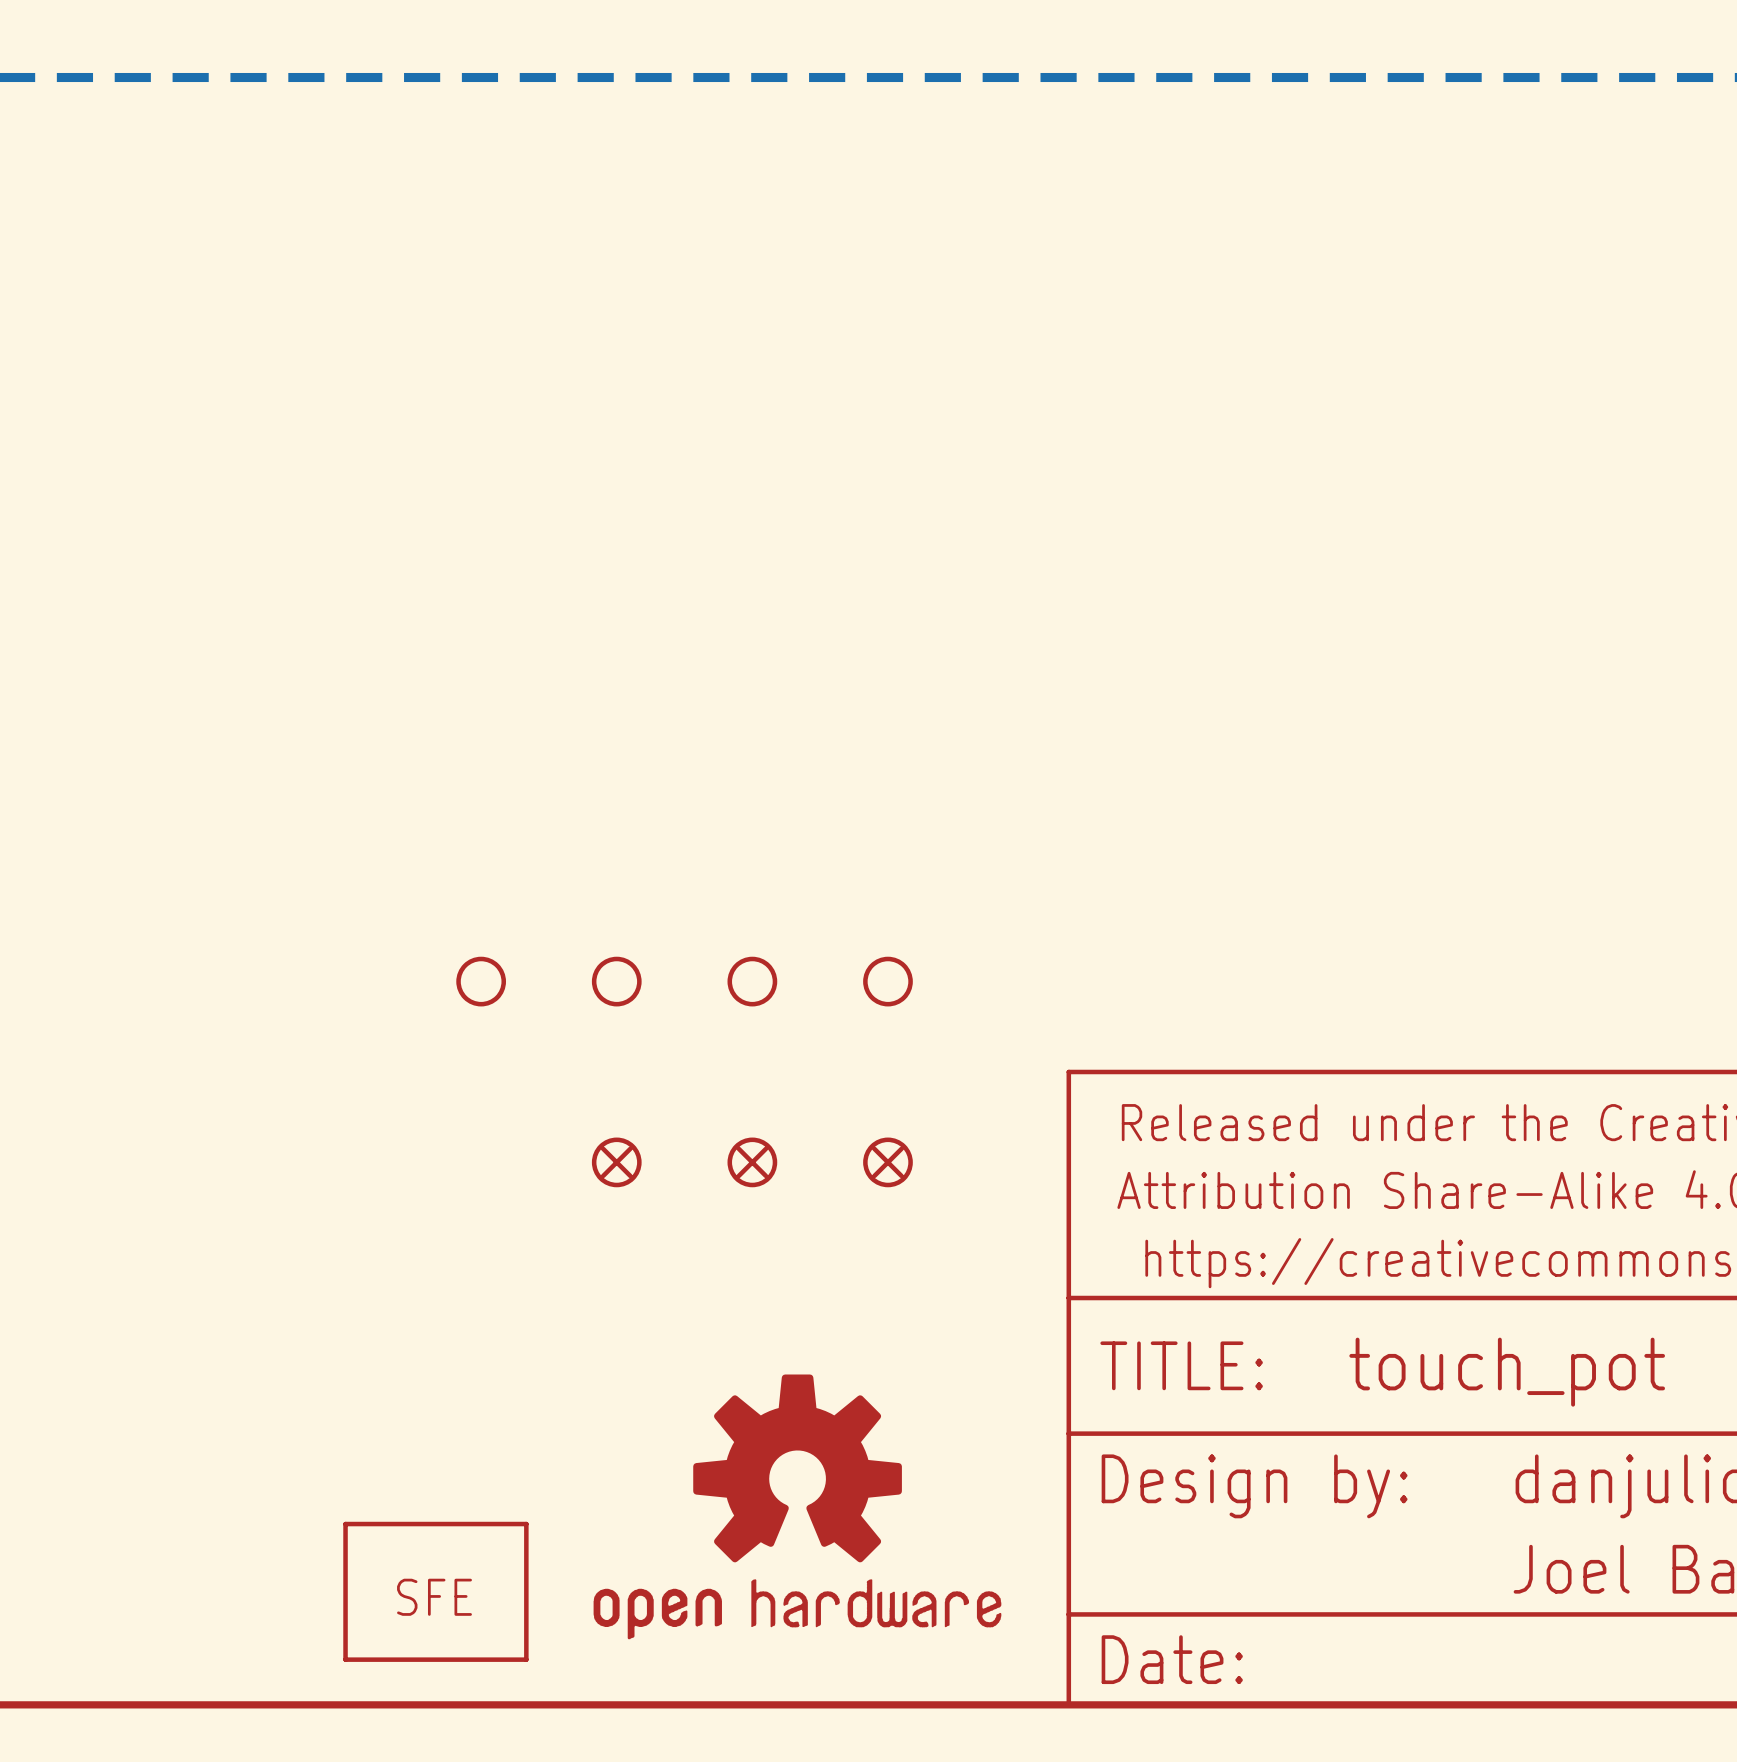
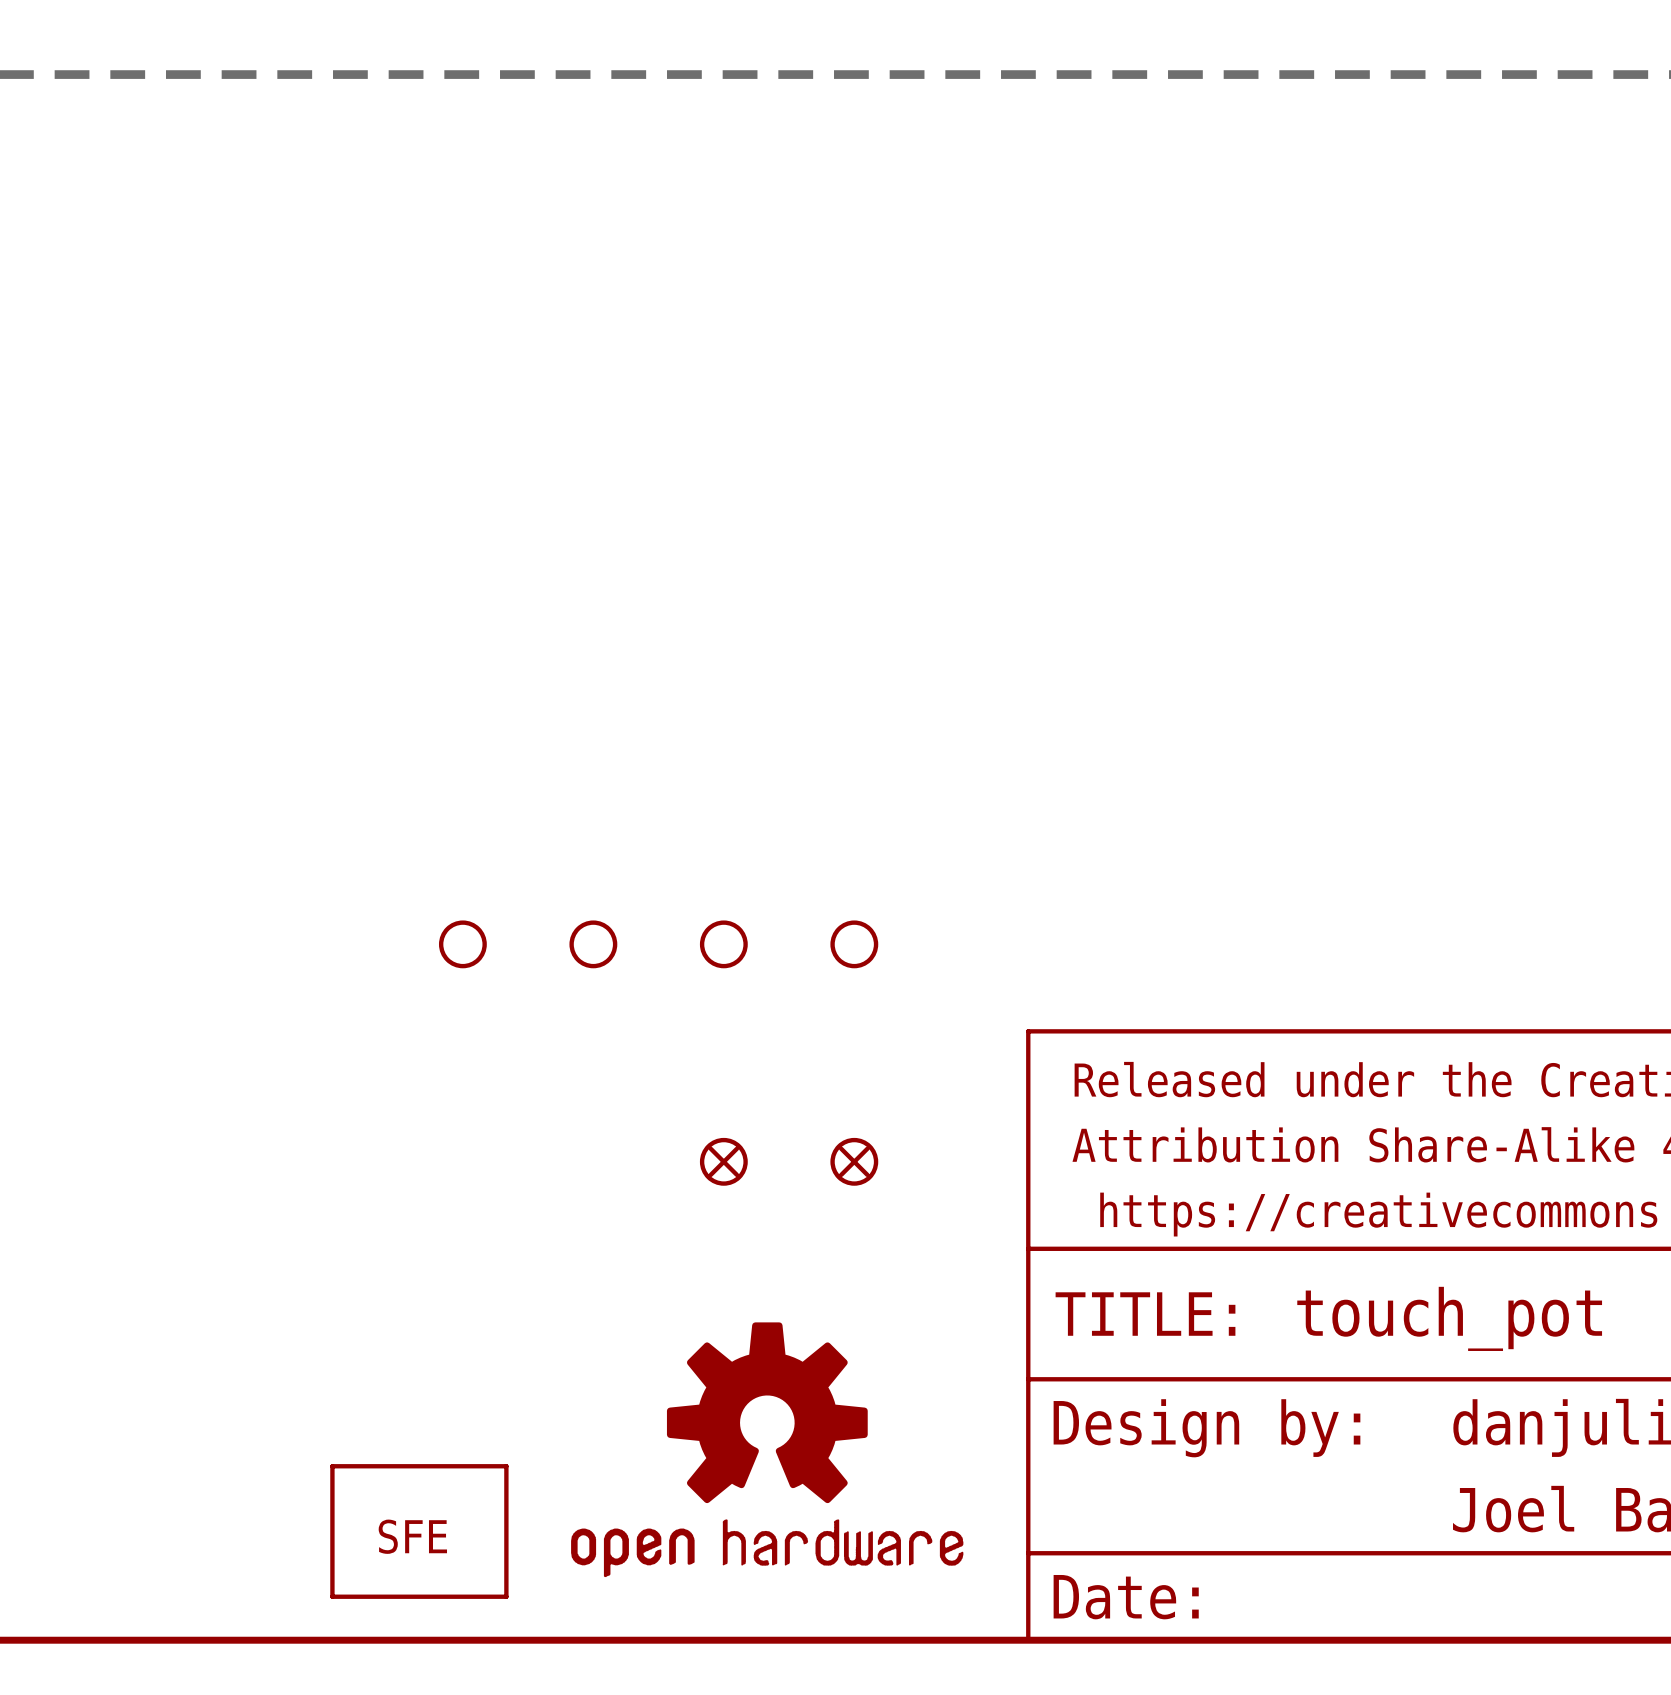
part: (616, 1162) -> none
part position: (752, 1162) -> (723, 1161)
part position: (887, 1162) -> (854, 1161)

